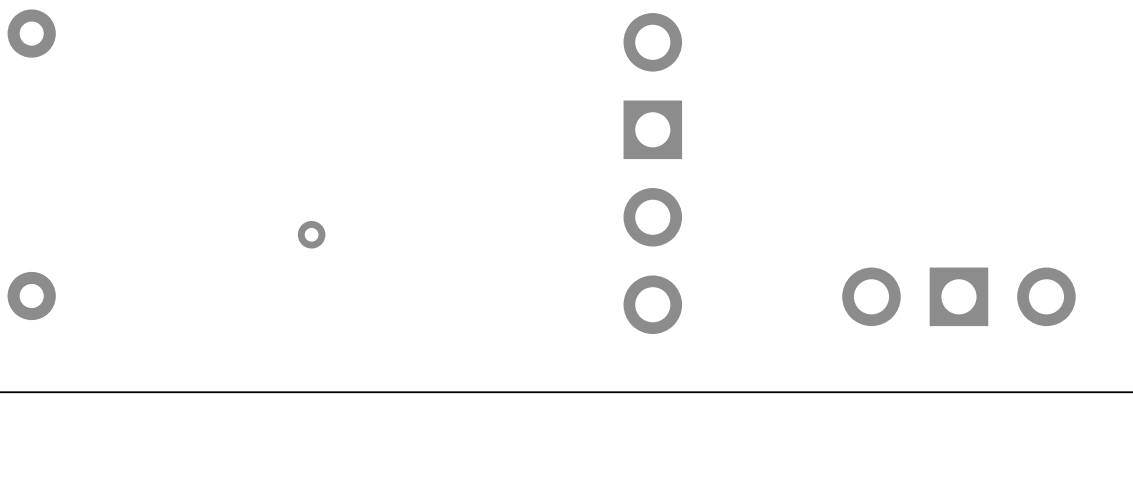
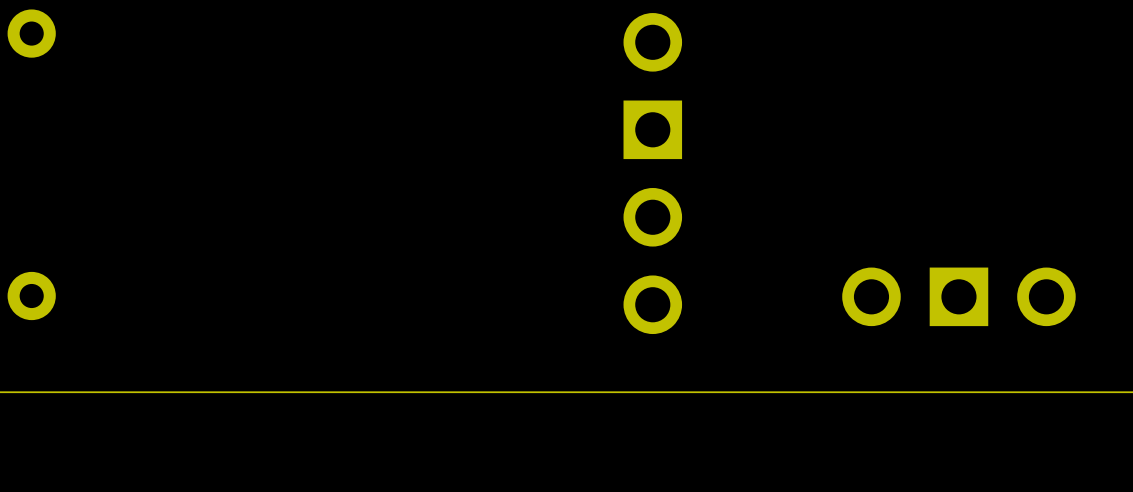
via: (311, 234) -> none

